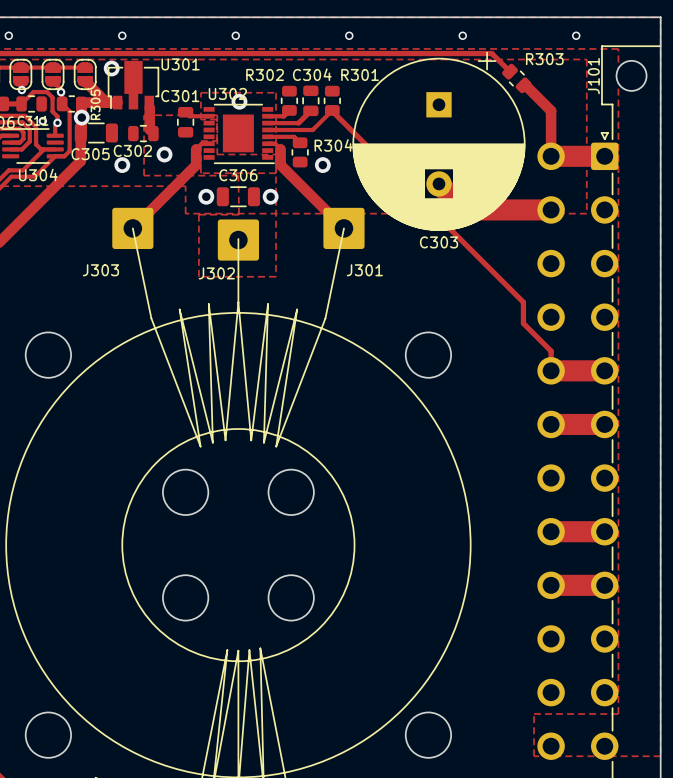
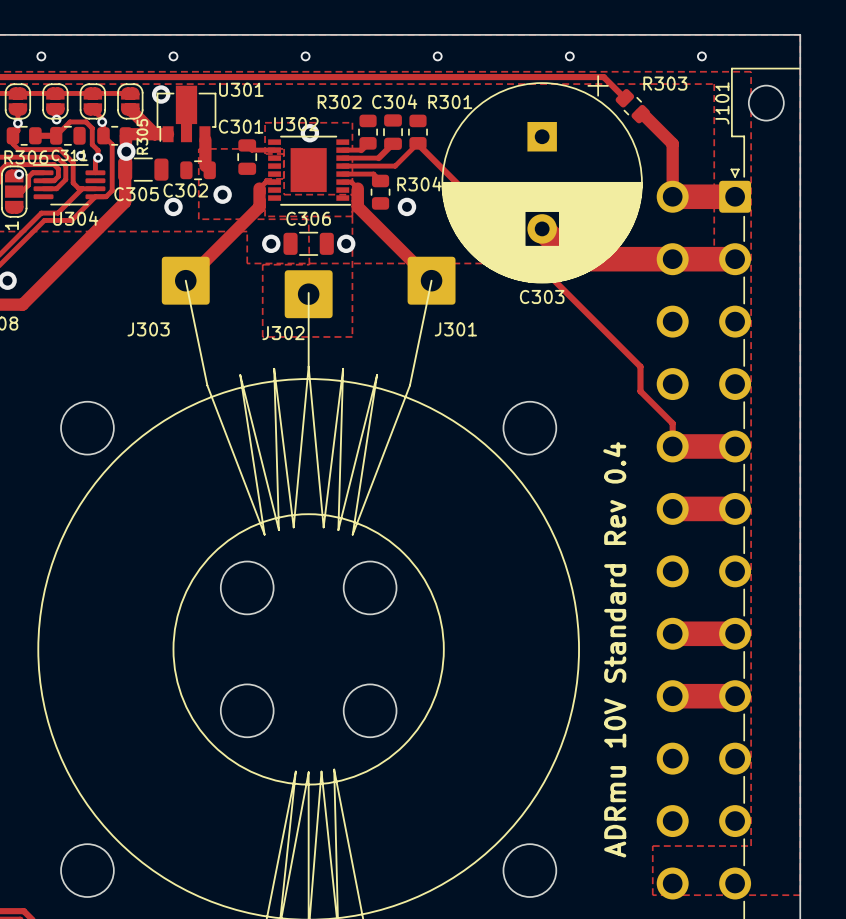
track: none -> (672, 259) (735, 259)
text: none -> ADRmu 10V Standard Rev 0.4 (614, 649)

